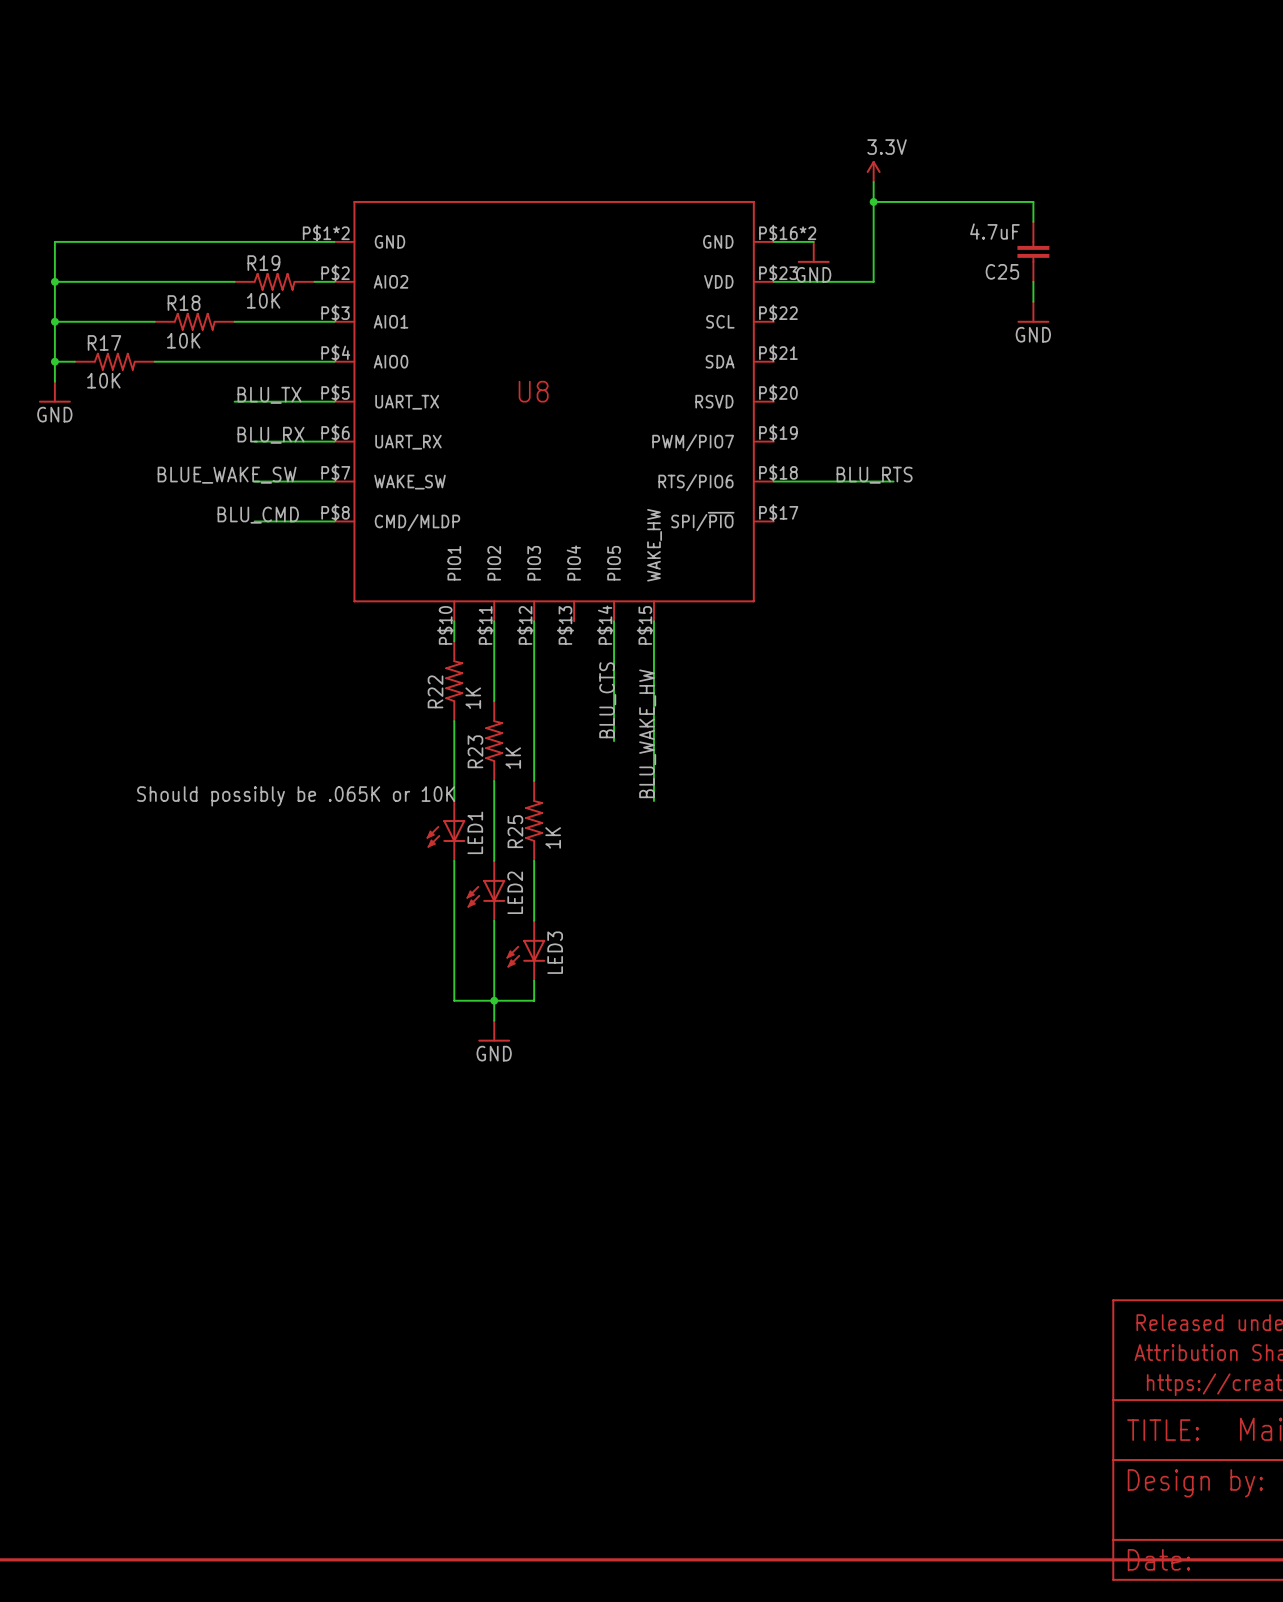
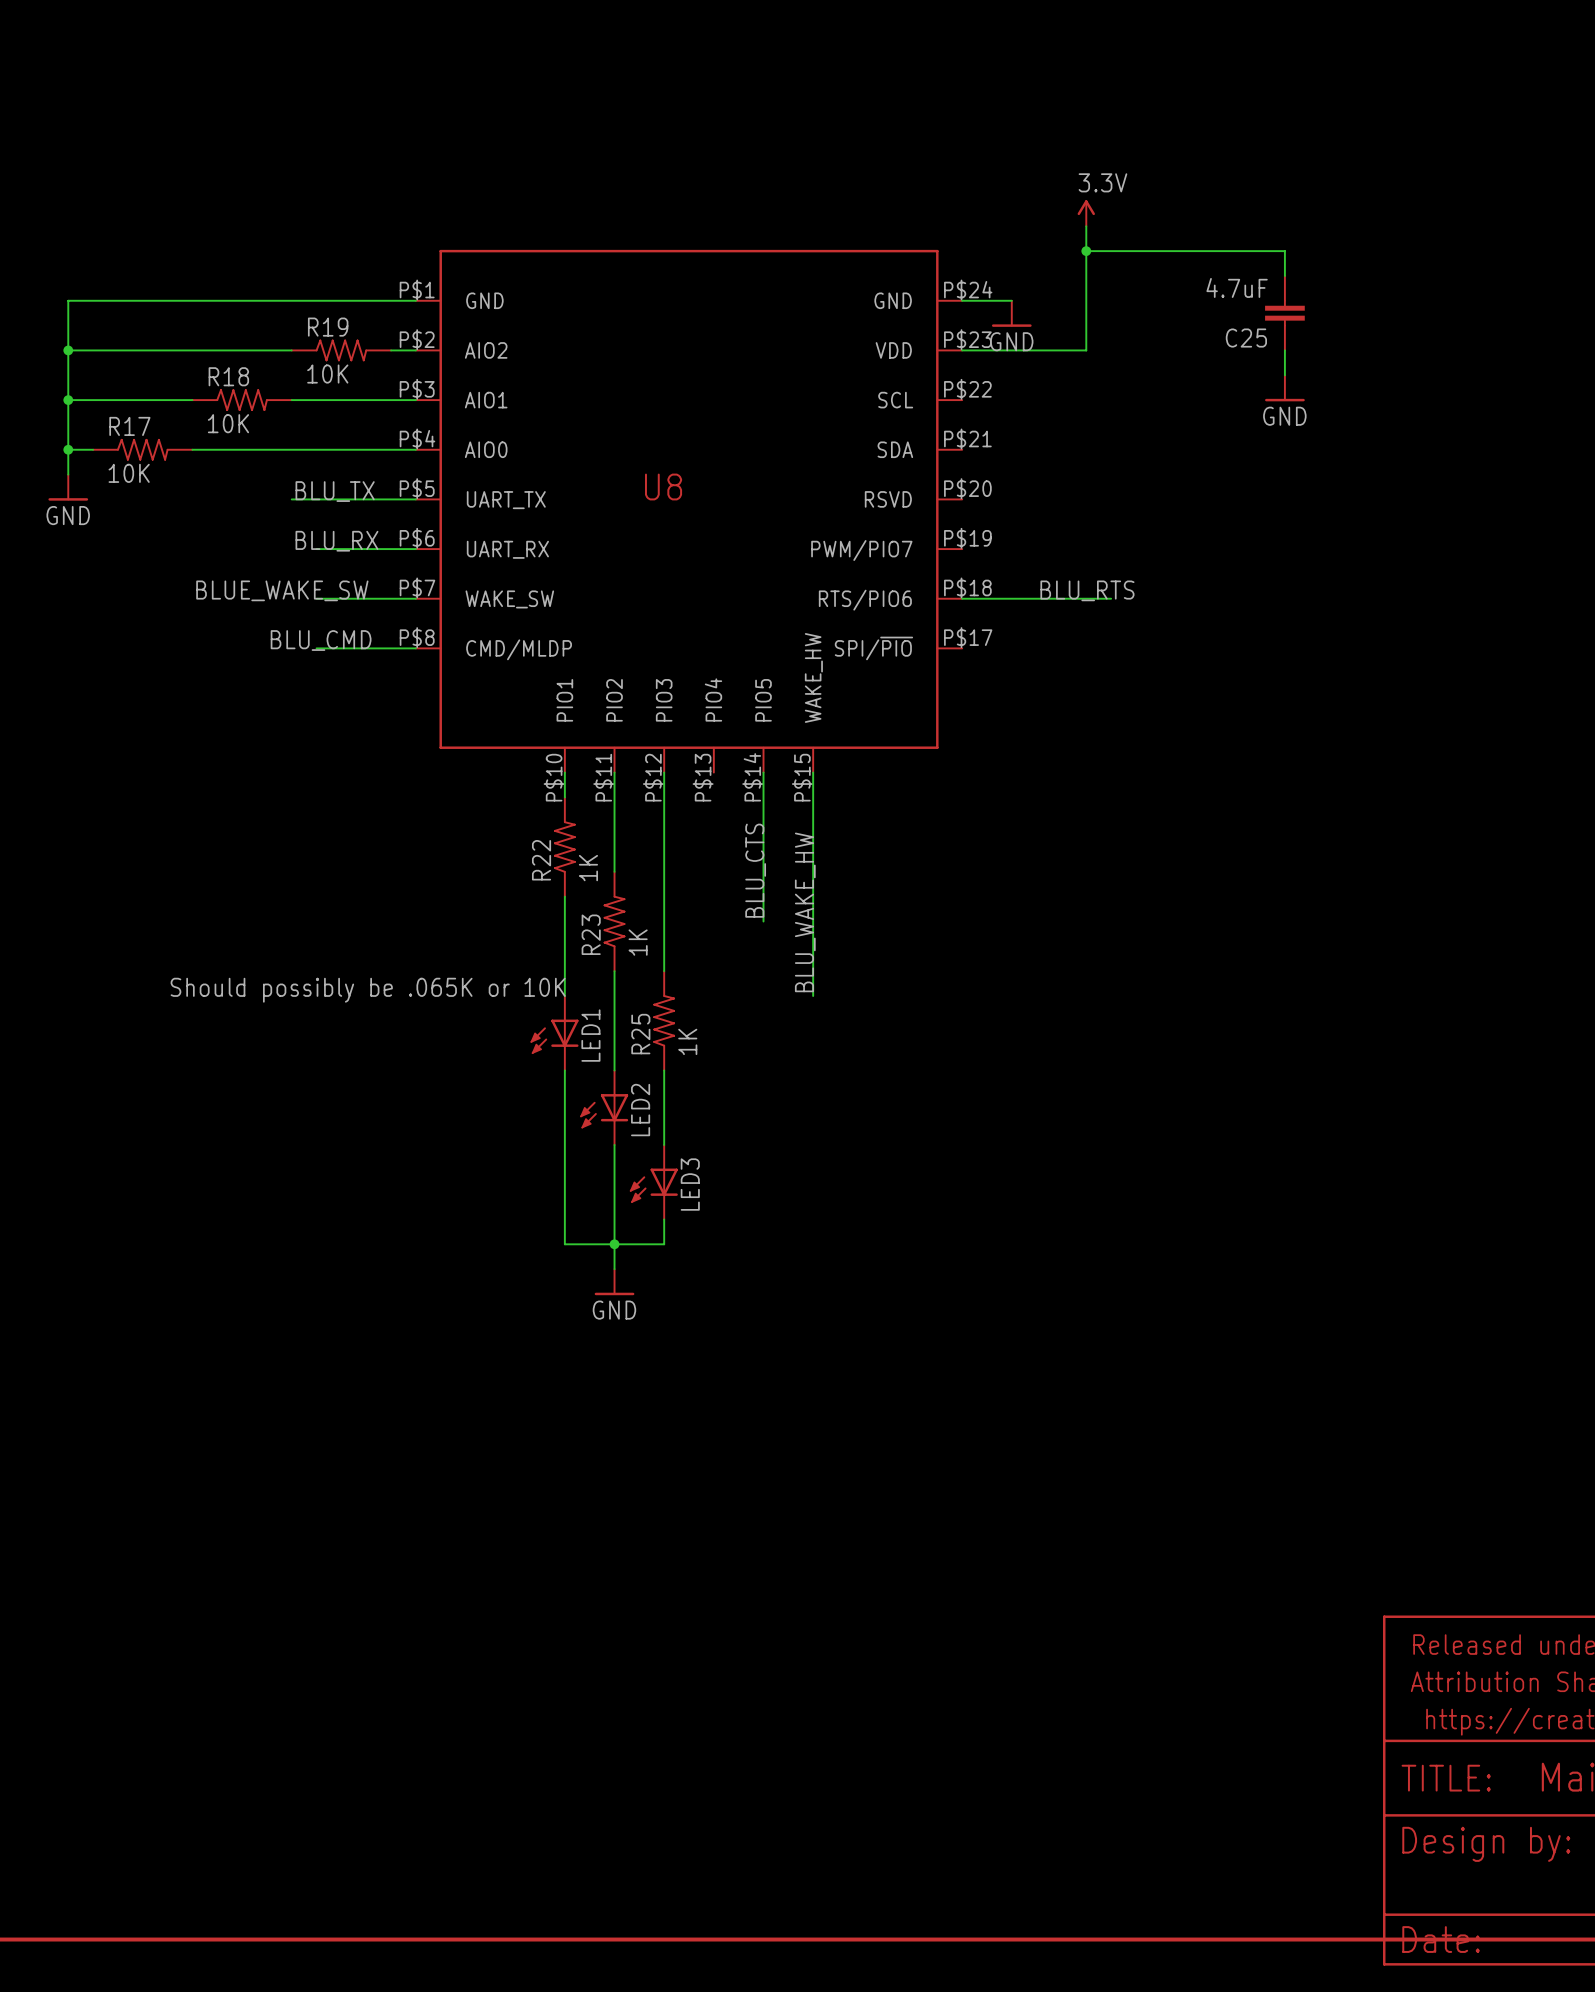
U8 pin number: P$1*2 (326, 233) -> P$1 (417, 290)
U8 pin number: P$16*2 (787, 233) -> P$24 (968, 290)

